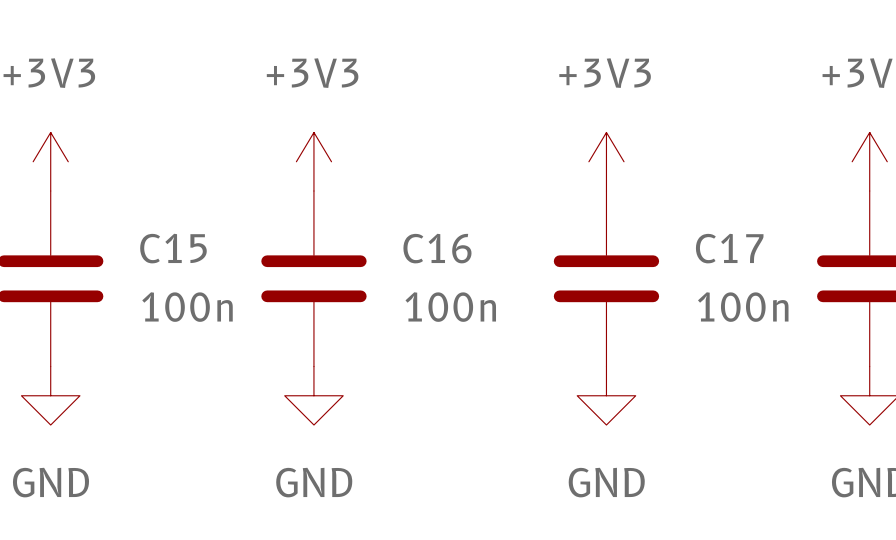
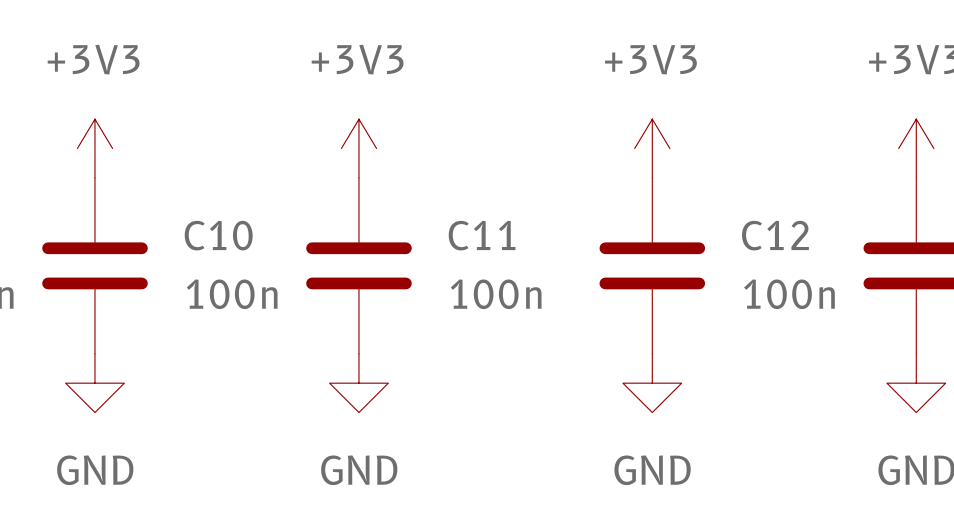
C15 name: C15 (173, 248) -> C10 (218, 235)
C16 name: C16 (437, 248) -> C11 (482, 235)
C17 name: C17 (729, 248) -> C12 (775, 235)

